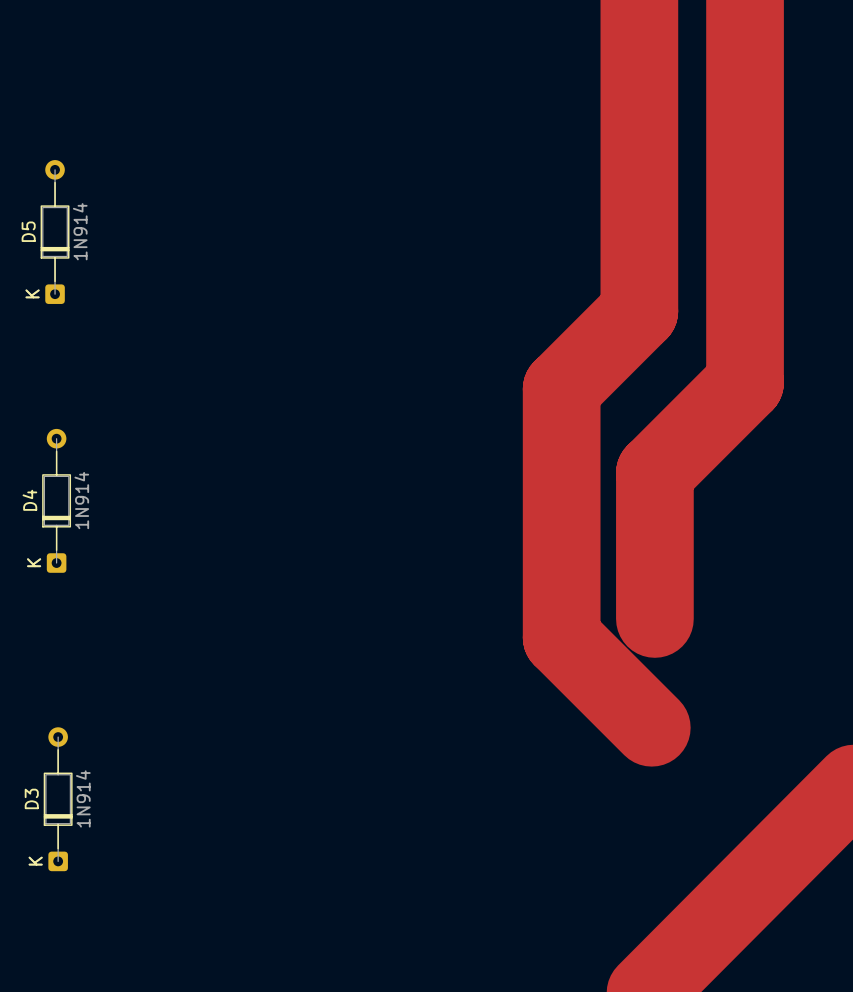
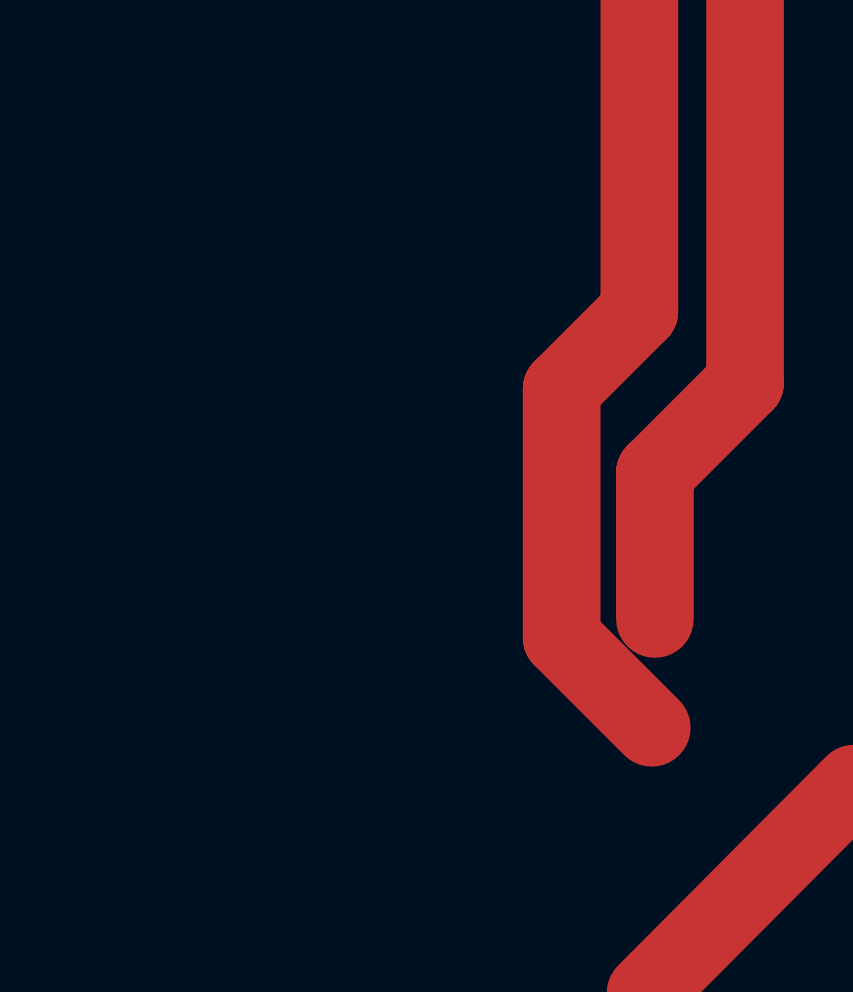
D5: 1N914 (55, 232) -> none
D4: 1N914 (56, 500) -> none
D3: 1N914 (58, 799) -> none

